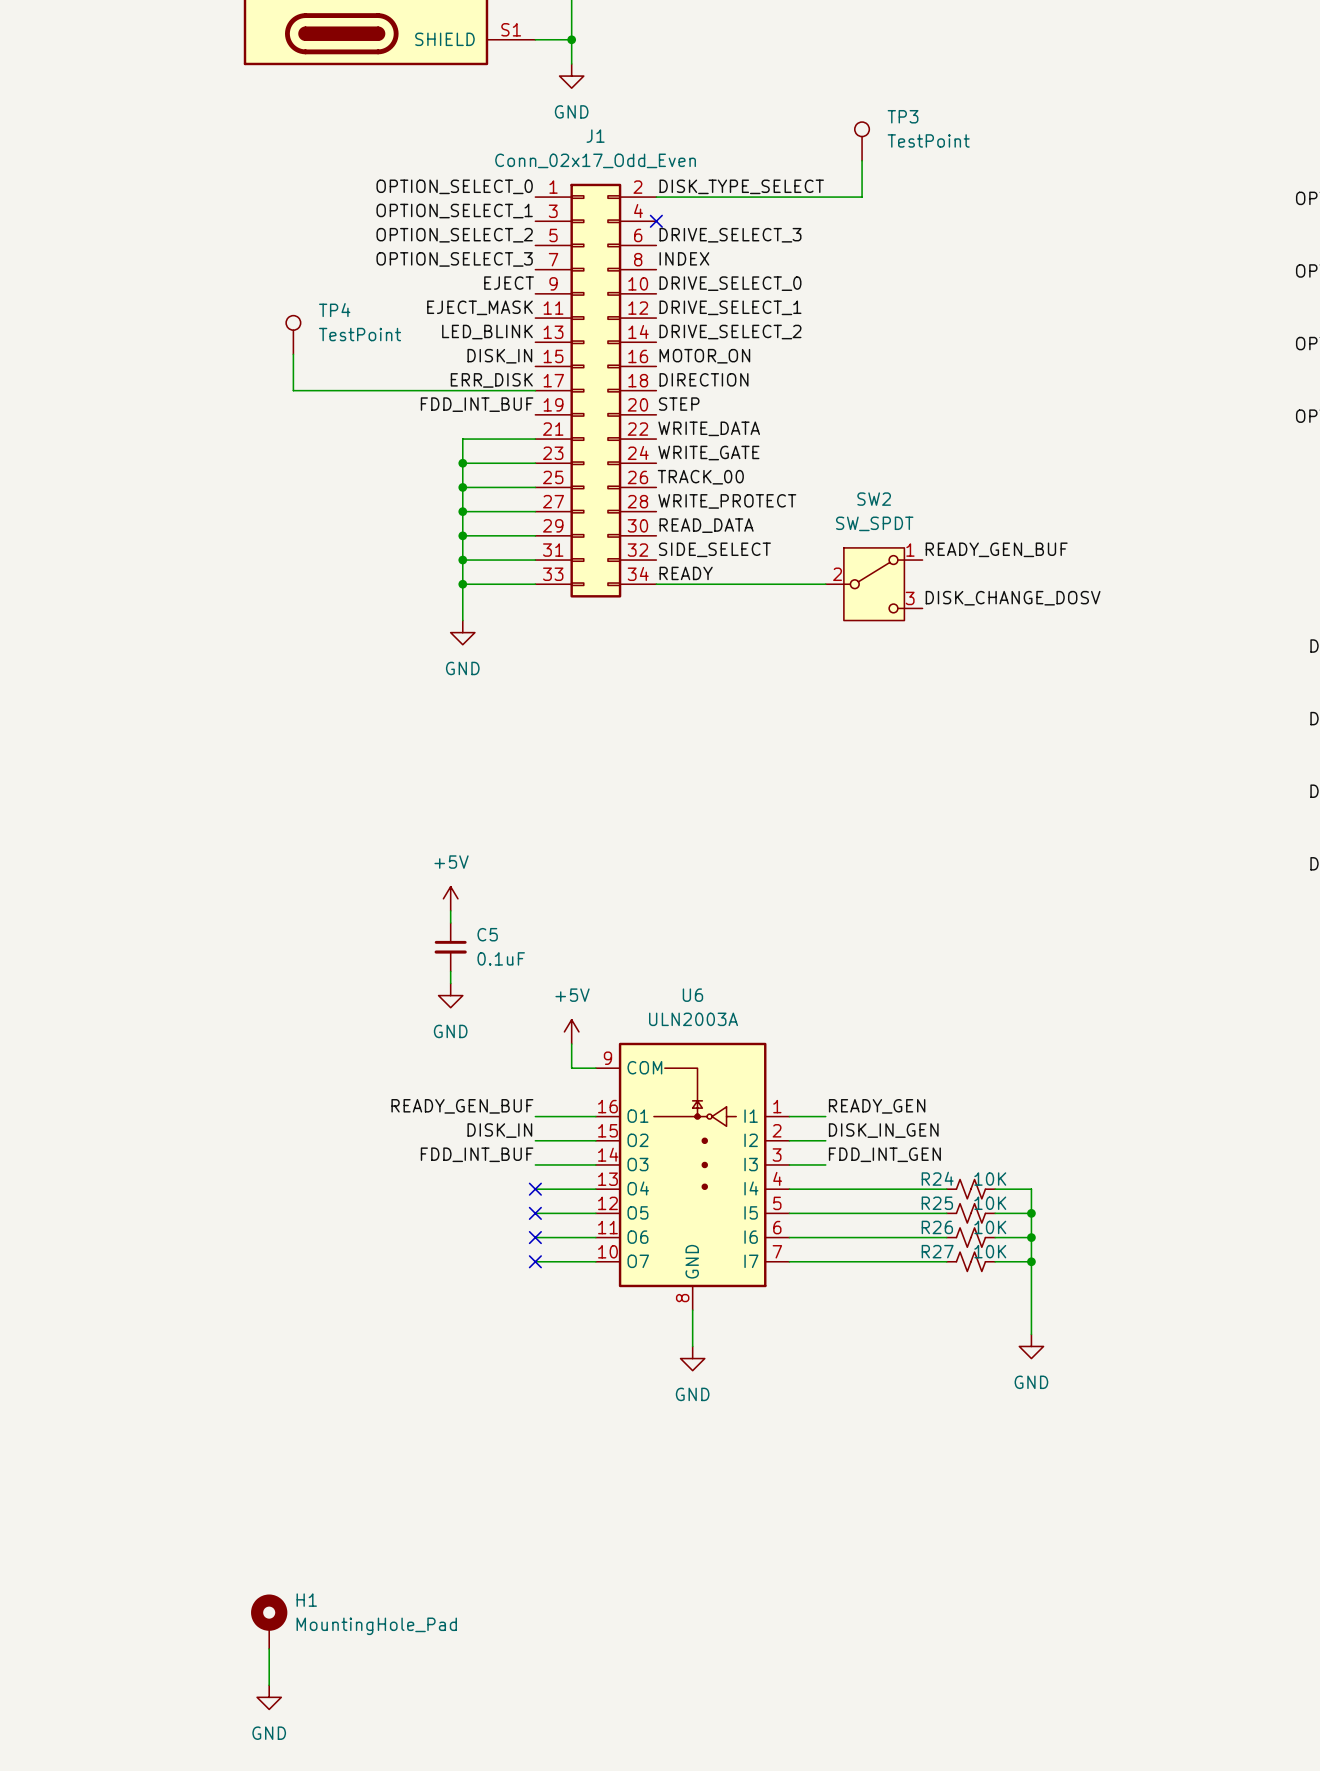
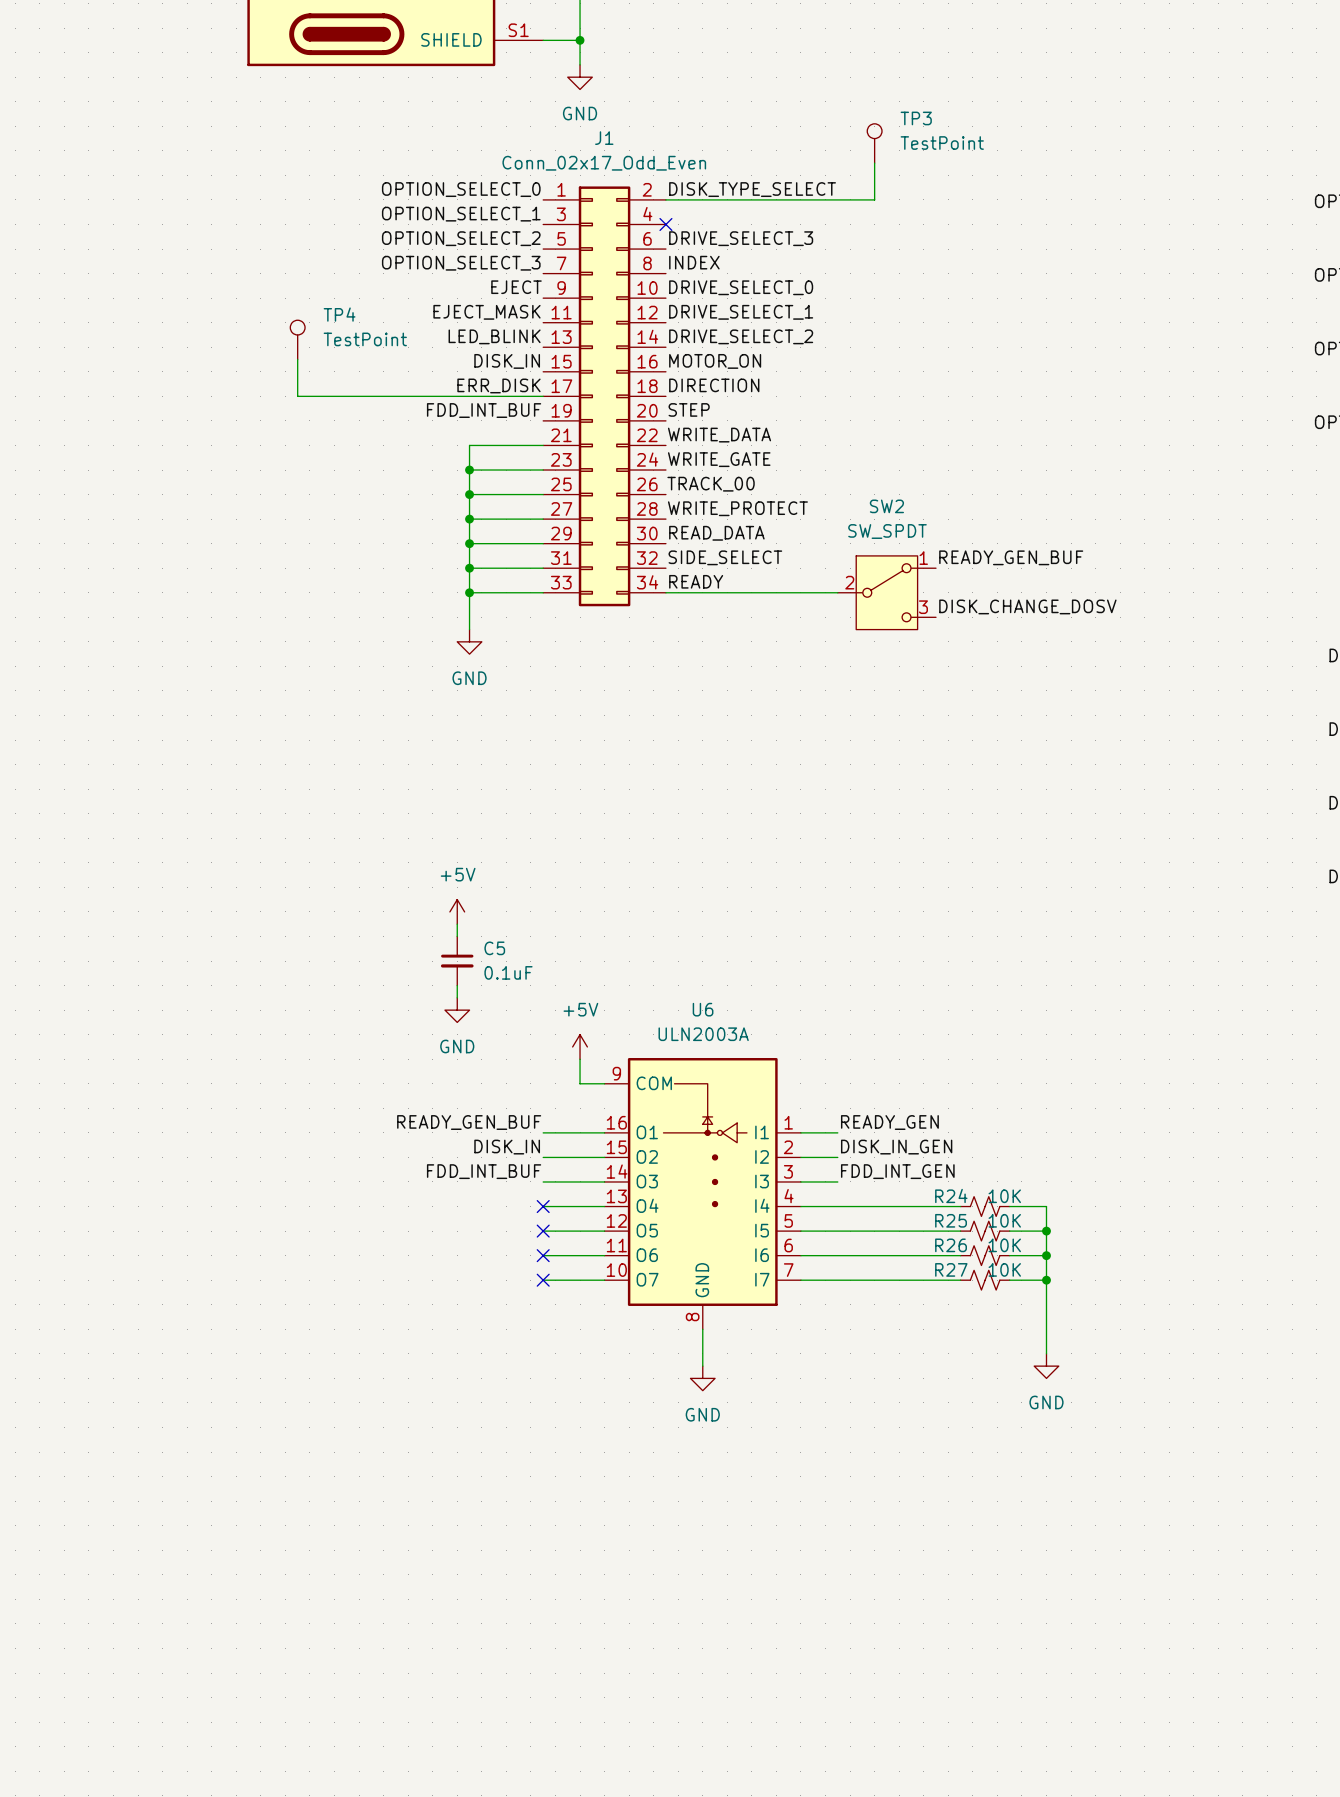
H1: MountingHole_Pad (269, 1621) -> none
wire: (269, 1648) (269, 1685) -> none
power symbol: GND (269, 1697) -> none

